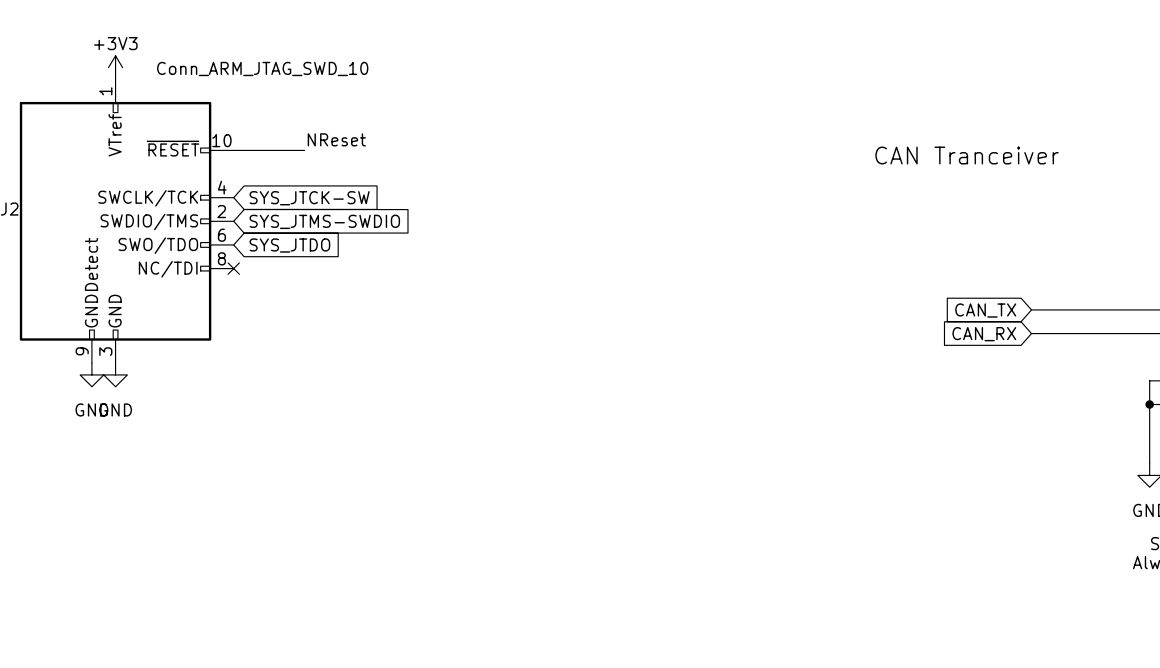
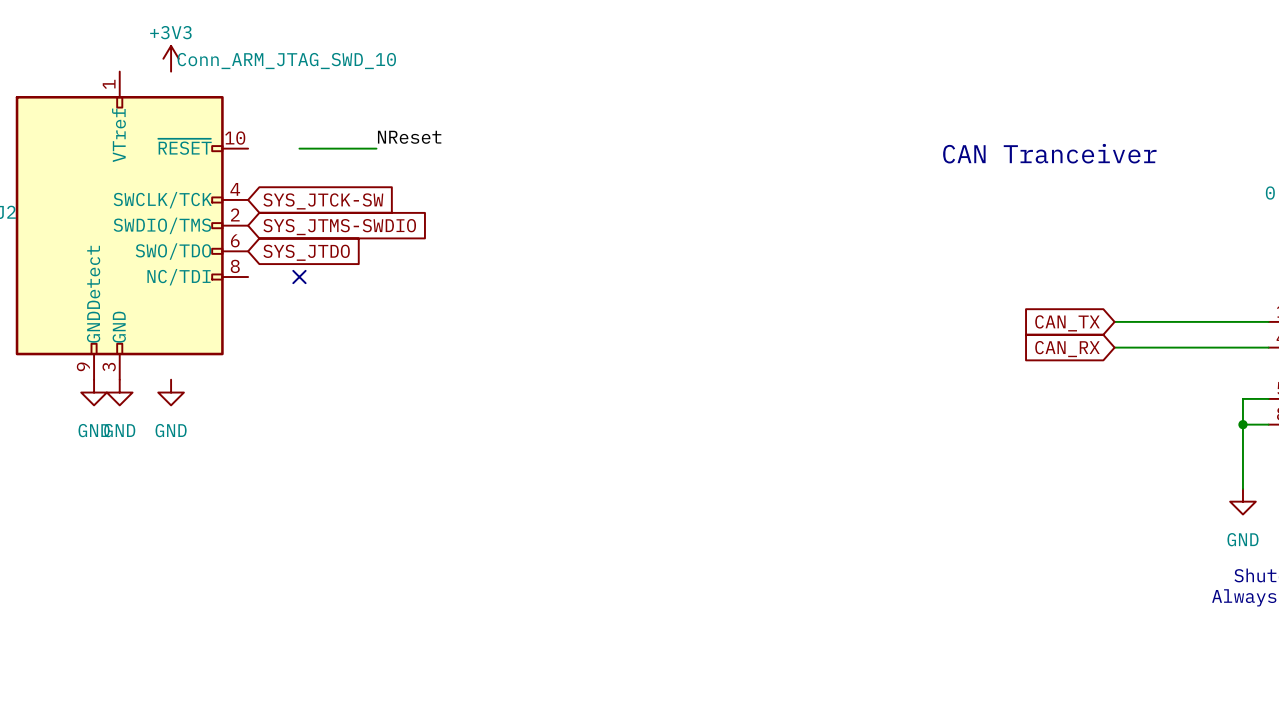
power symbol position: +3V3 (115, 67) -> +3V3 (171, 58)
label position: NReset (336, 139) -> NReset (409, 137)
wire: (233, 150) (281, 150) -> (325, 148) (376, 148)
no-connect mark position: (233, 268) -> (299, 277)
power symbol: none -> GND (171, 392)

